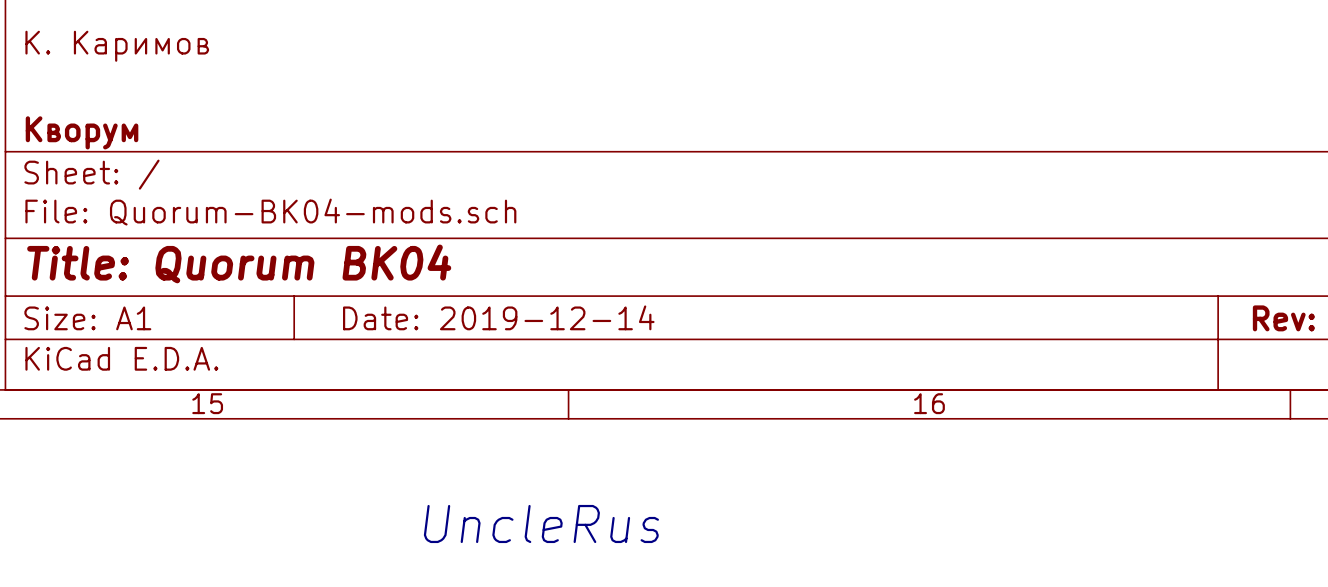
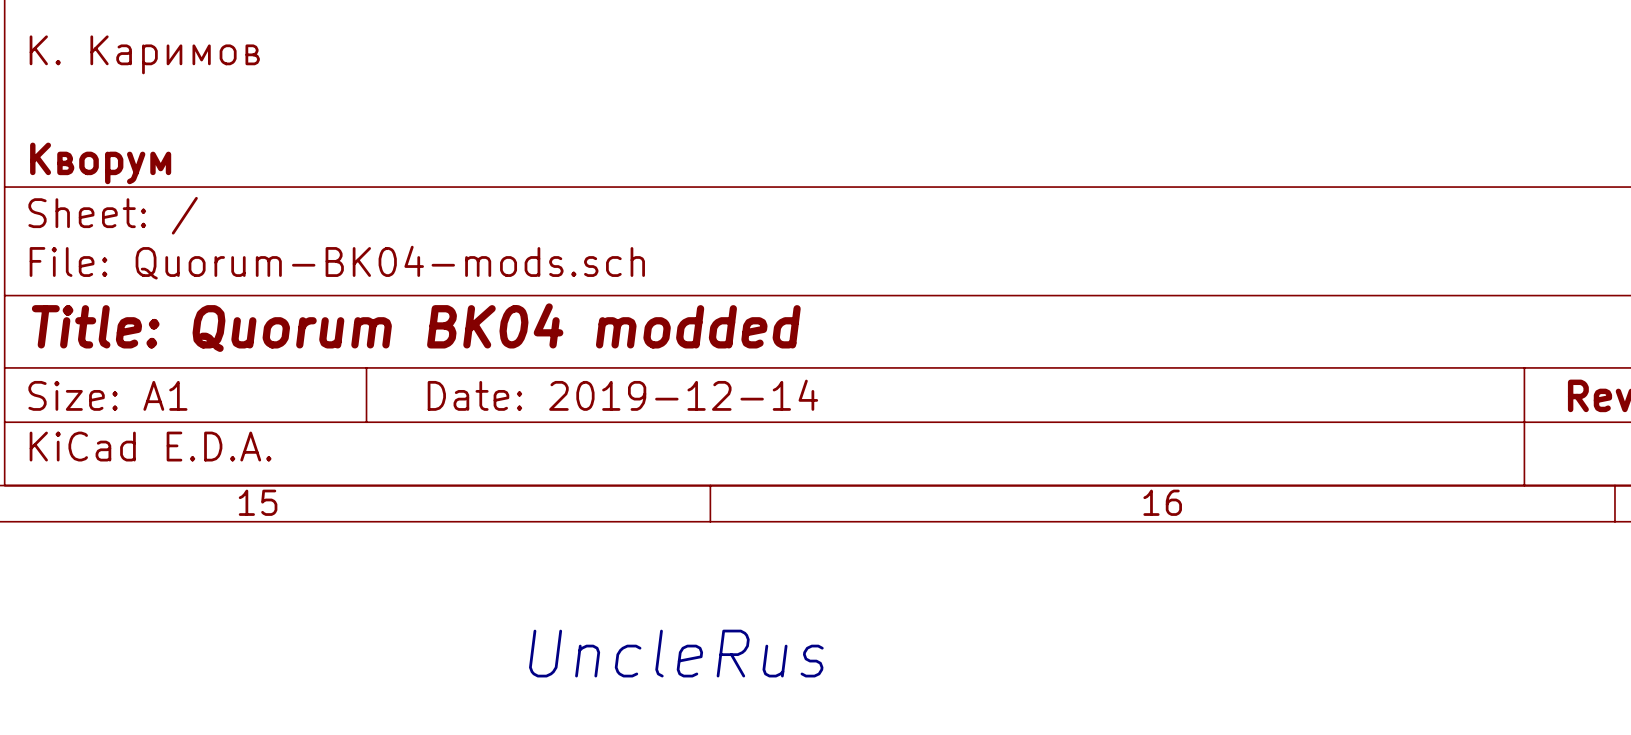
title block: Title: Quorum BK04 (239, 263) -> Title: Quorum BK04 modded (416, 327)

